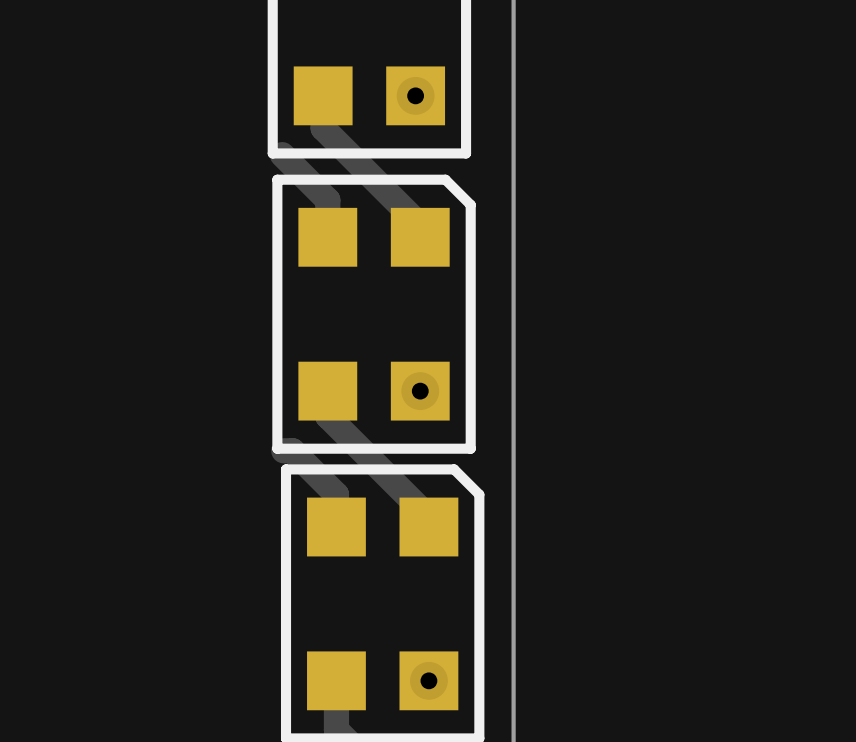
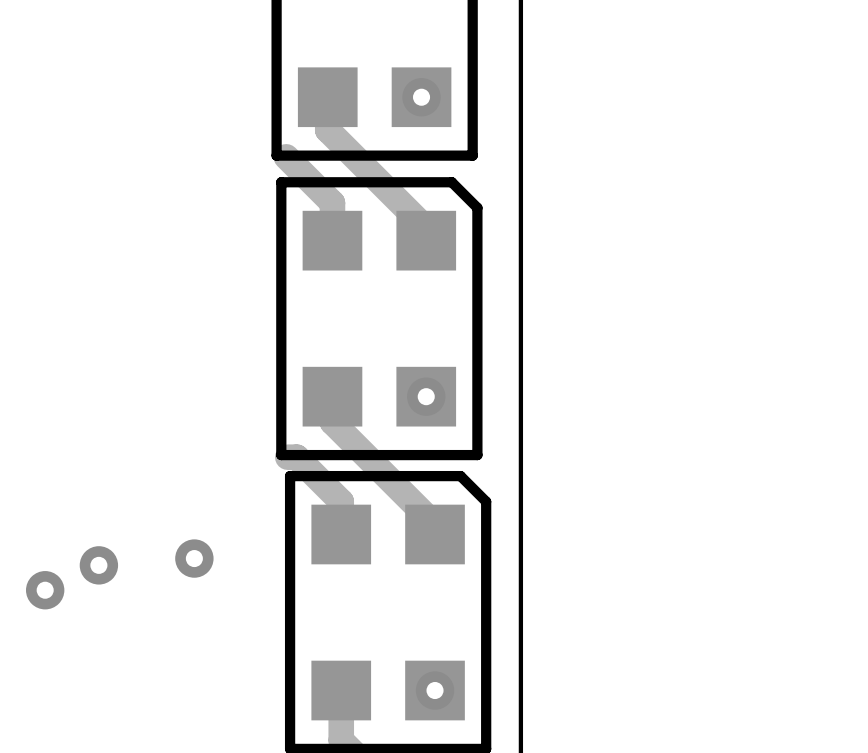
via: none -> (194, 558)
via: none -> (98, 565)
via: none -> (45, 590)

